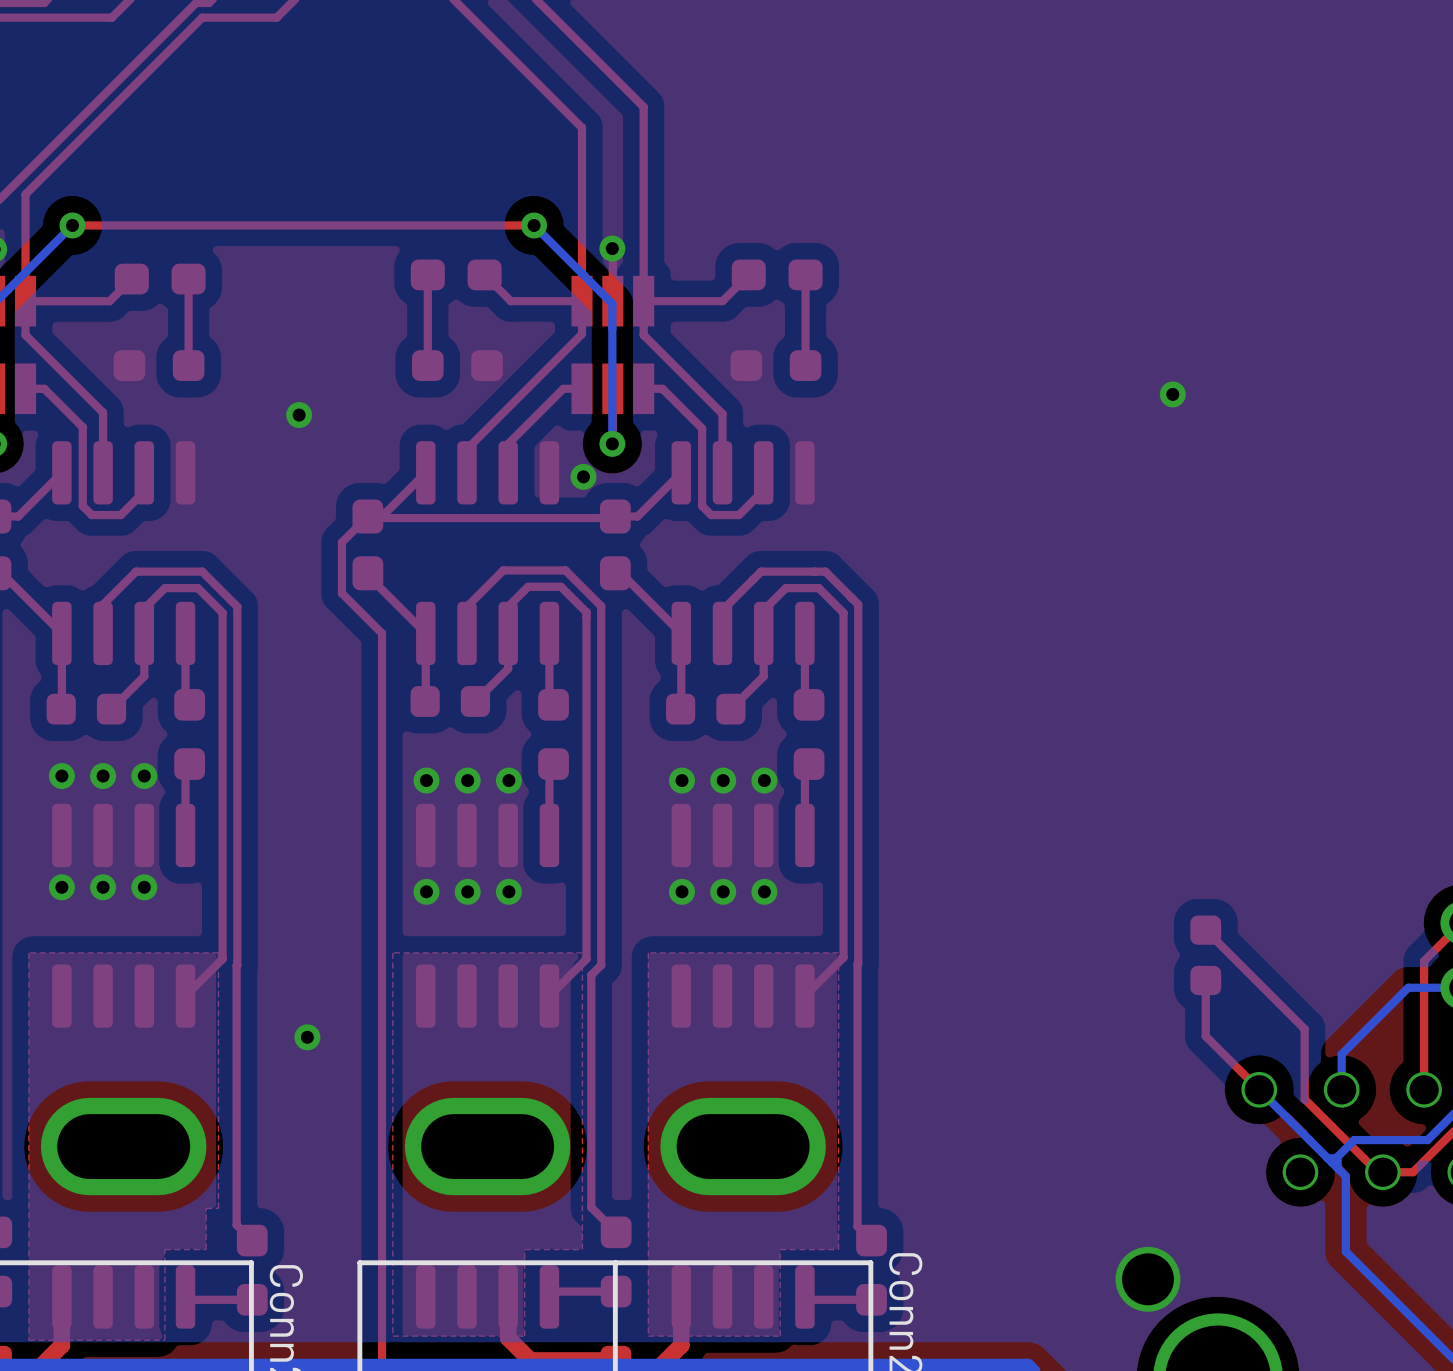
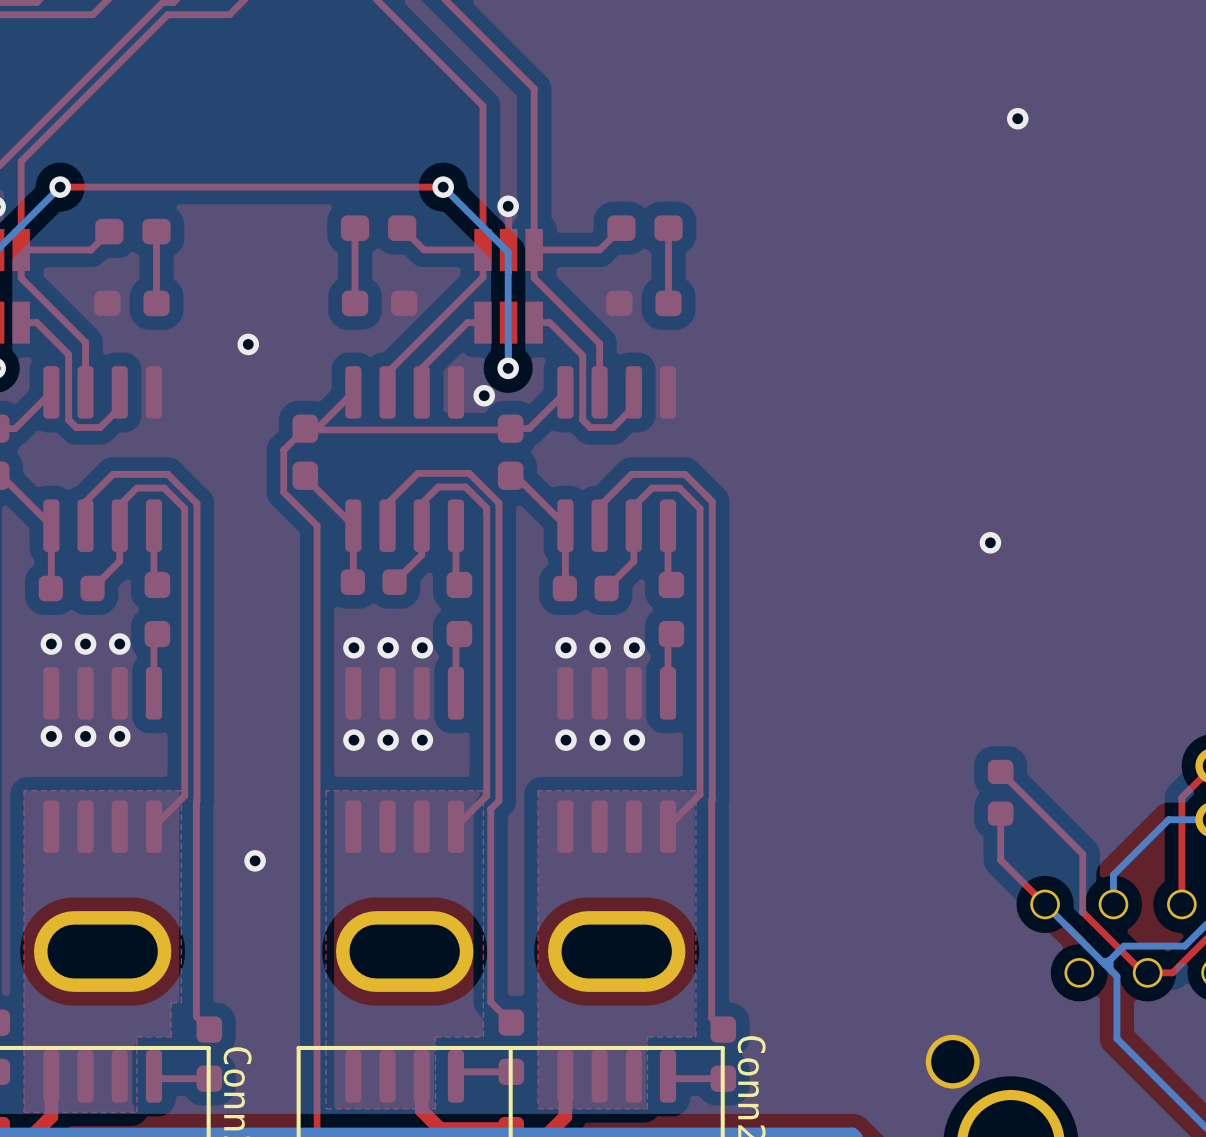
via: none -> (1017, 118)
via: (1172, 394) -> none
via: none -> (990, 542)

